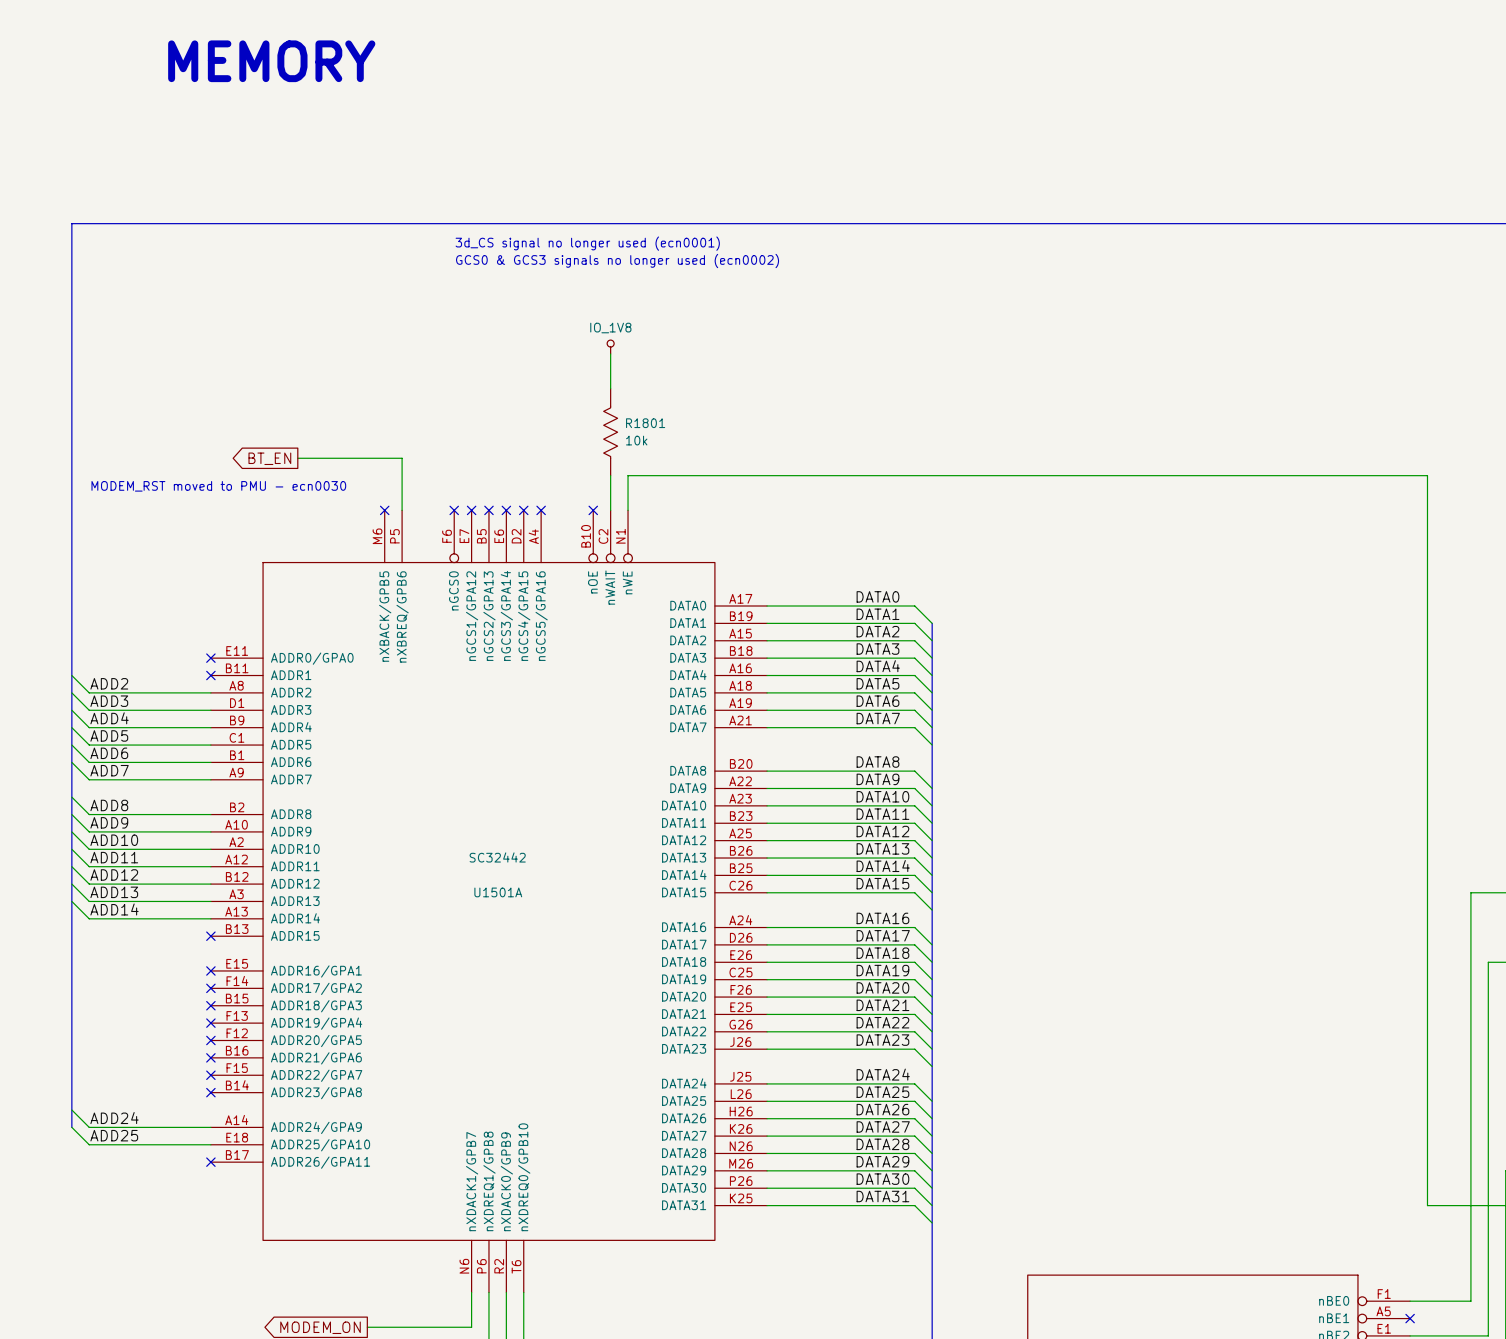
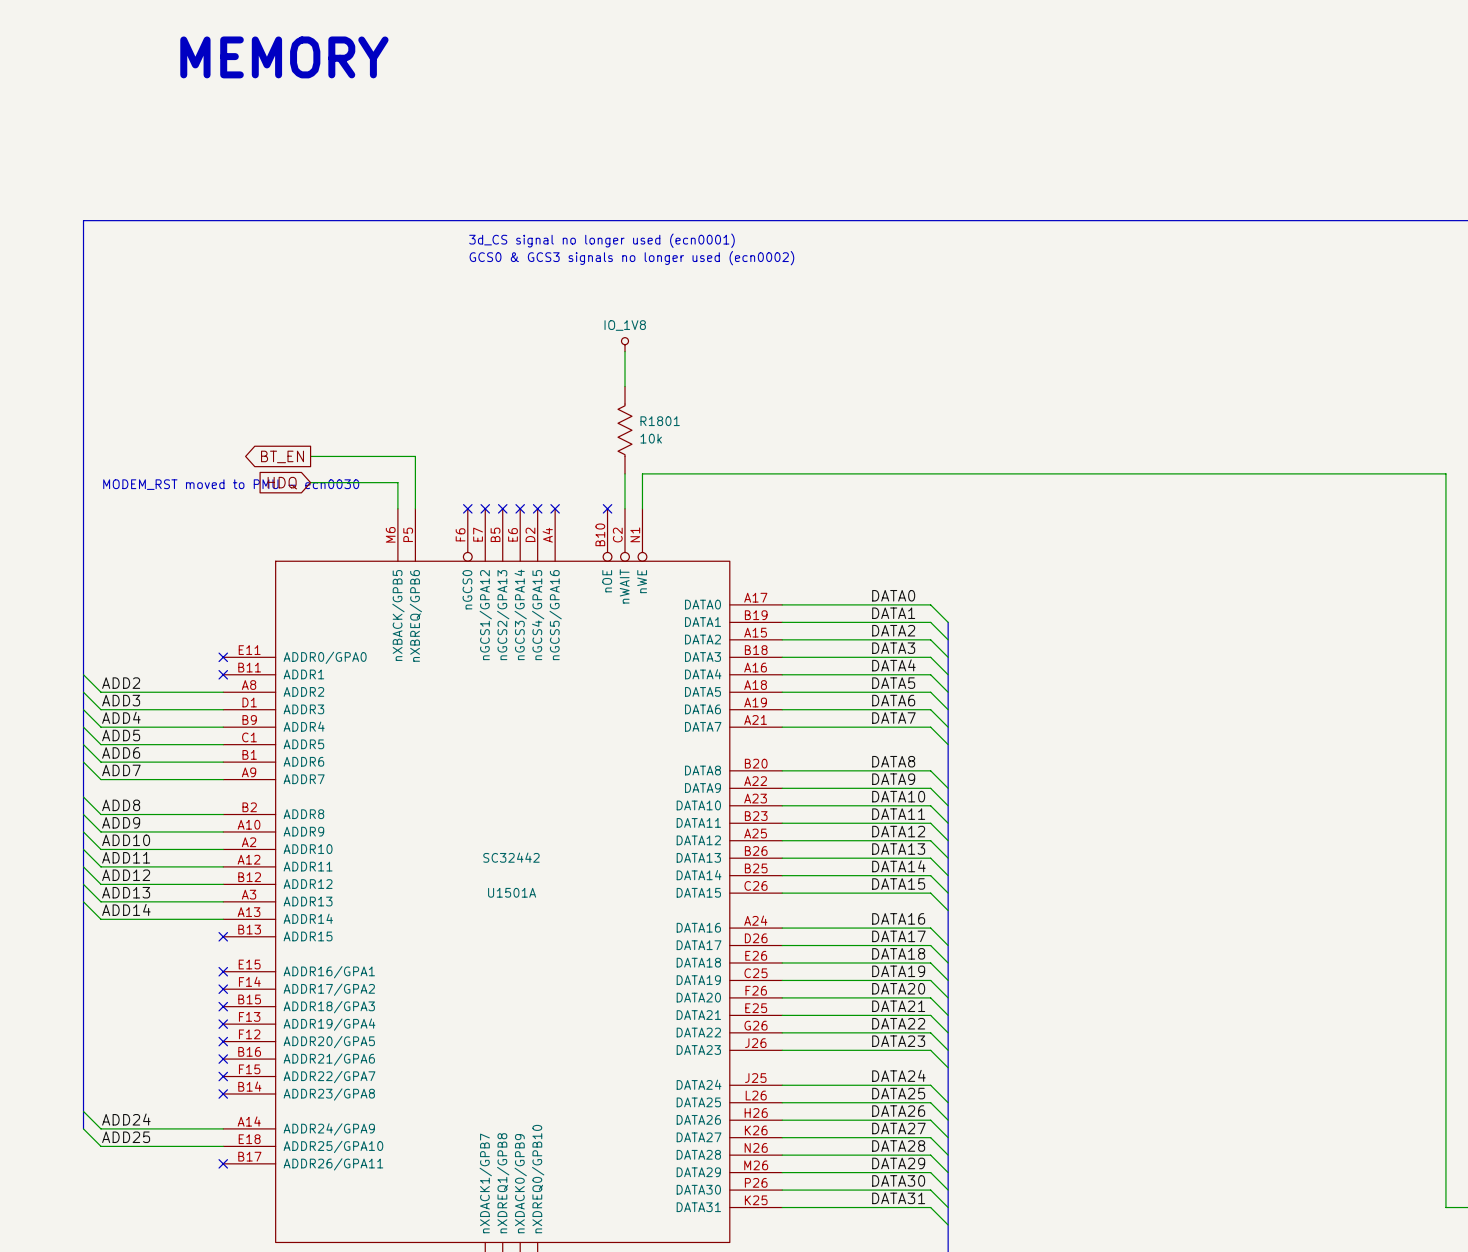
global label: none -> HDQ (282, 483)
wire: none -> (310, 482) (397, 482) (397, 508)
no-connect mark: (384, 510) -> none

